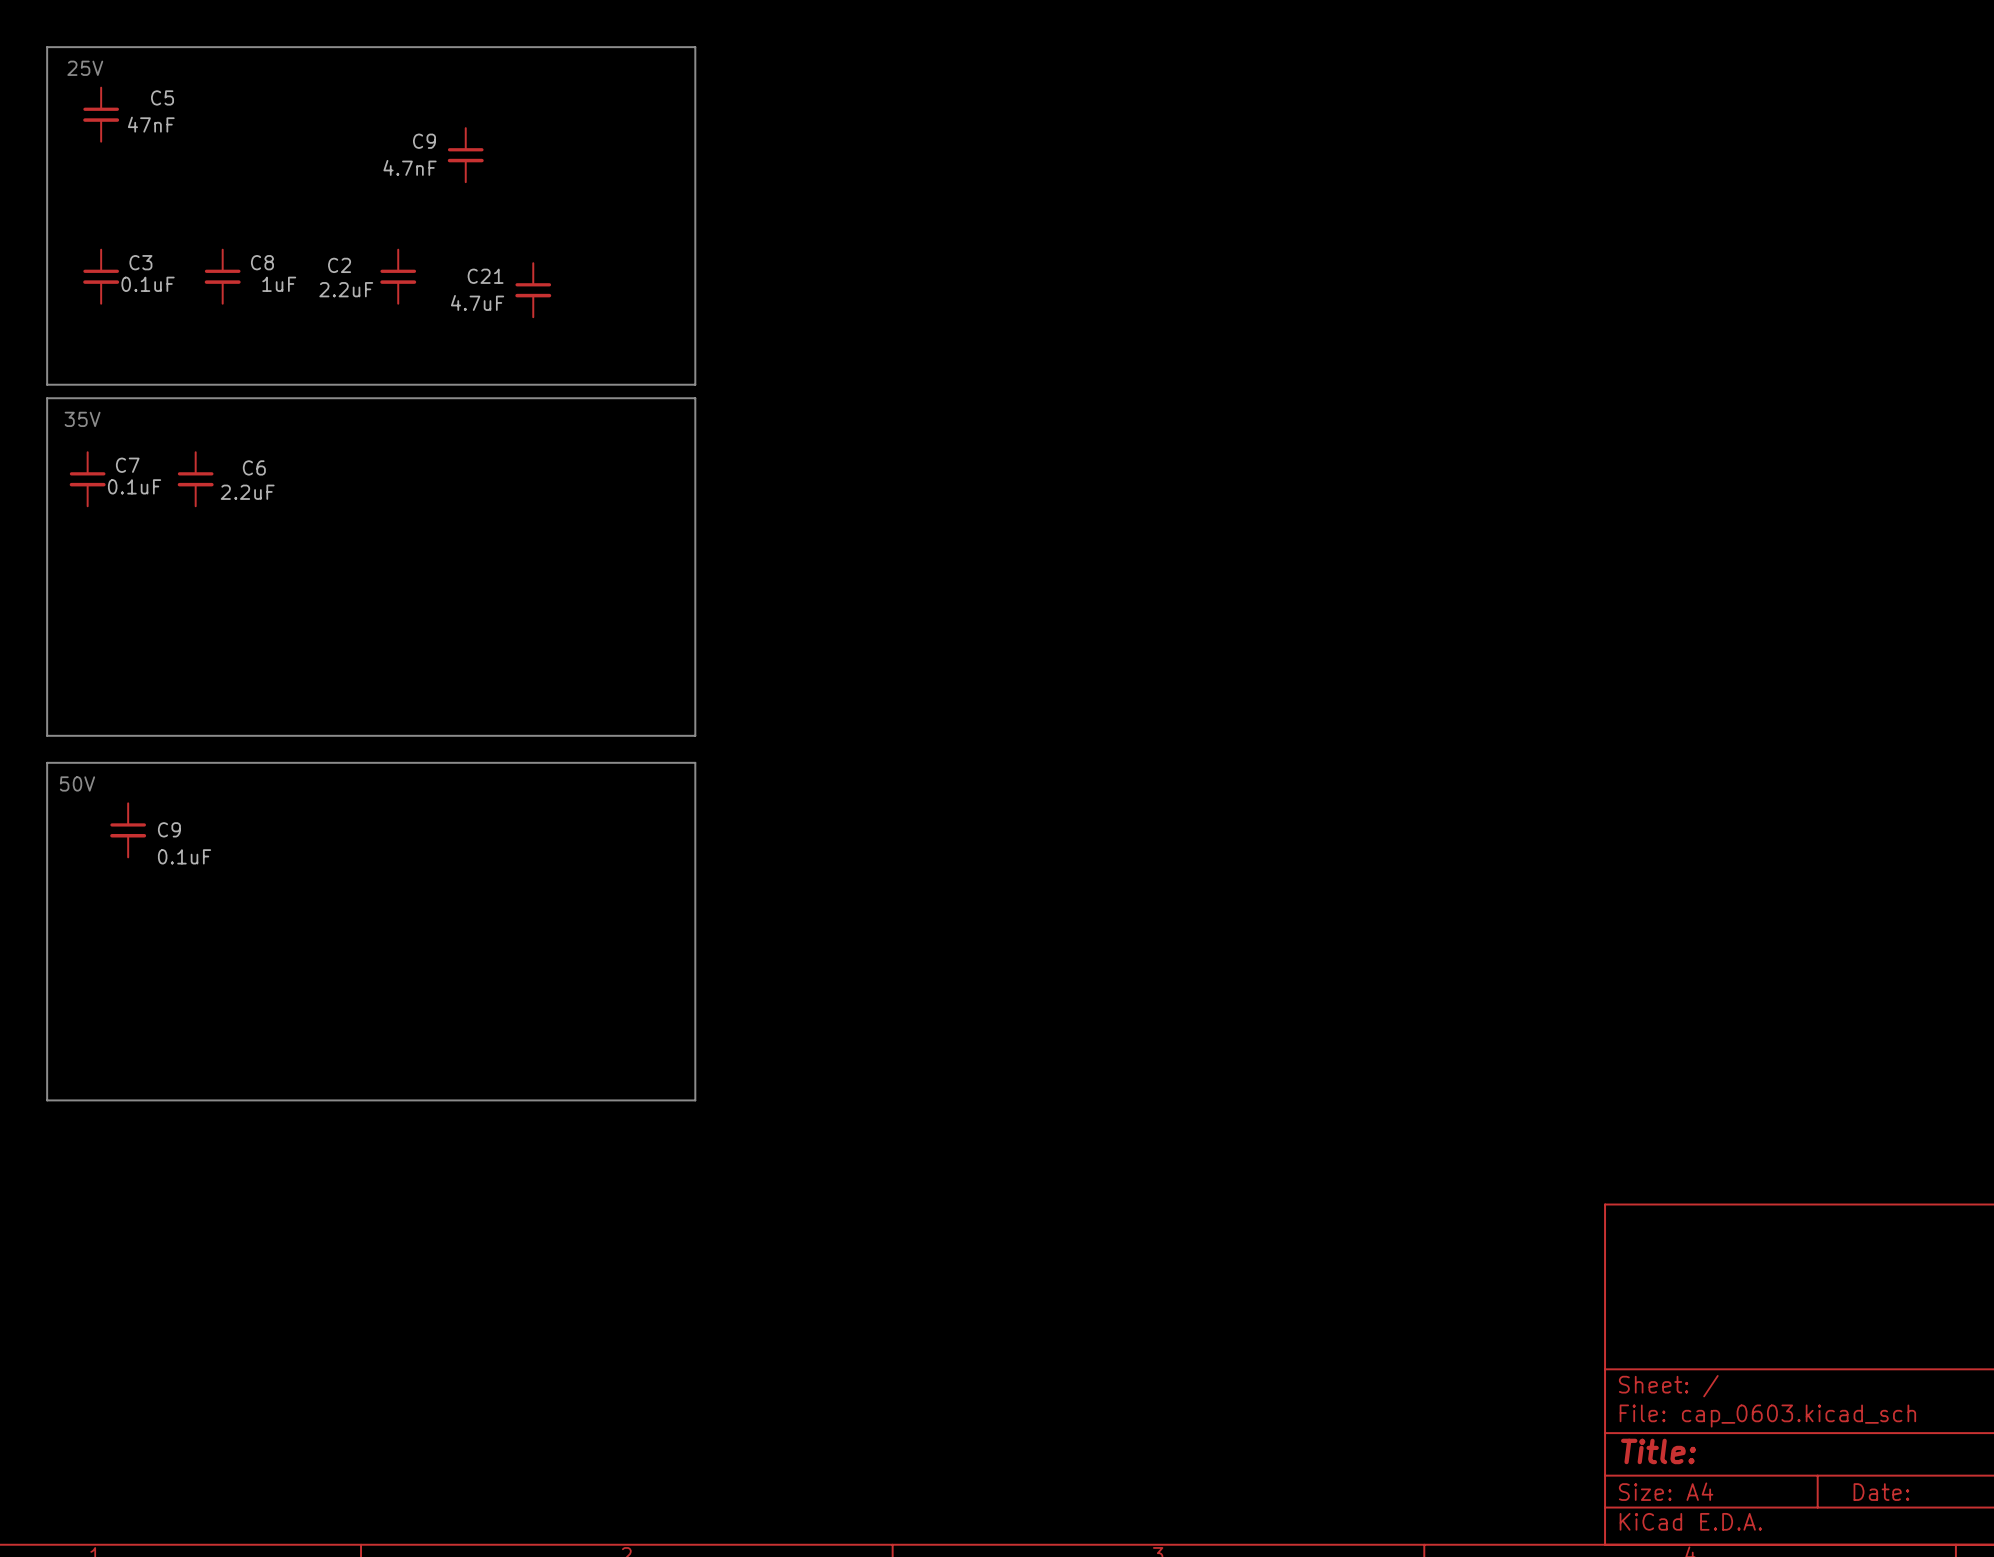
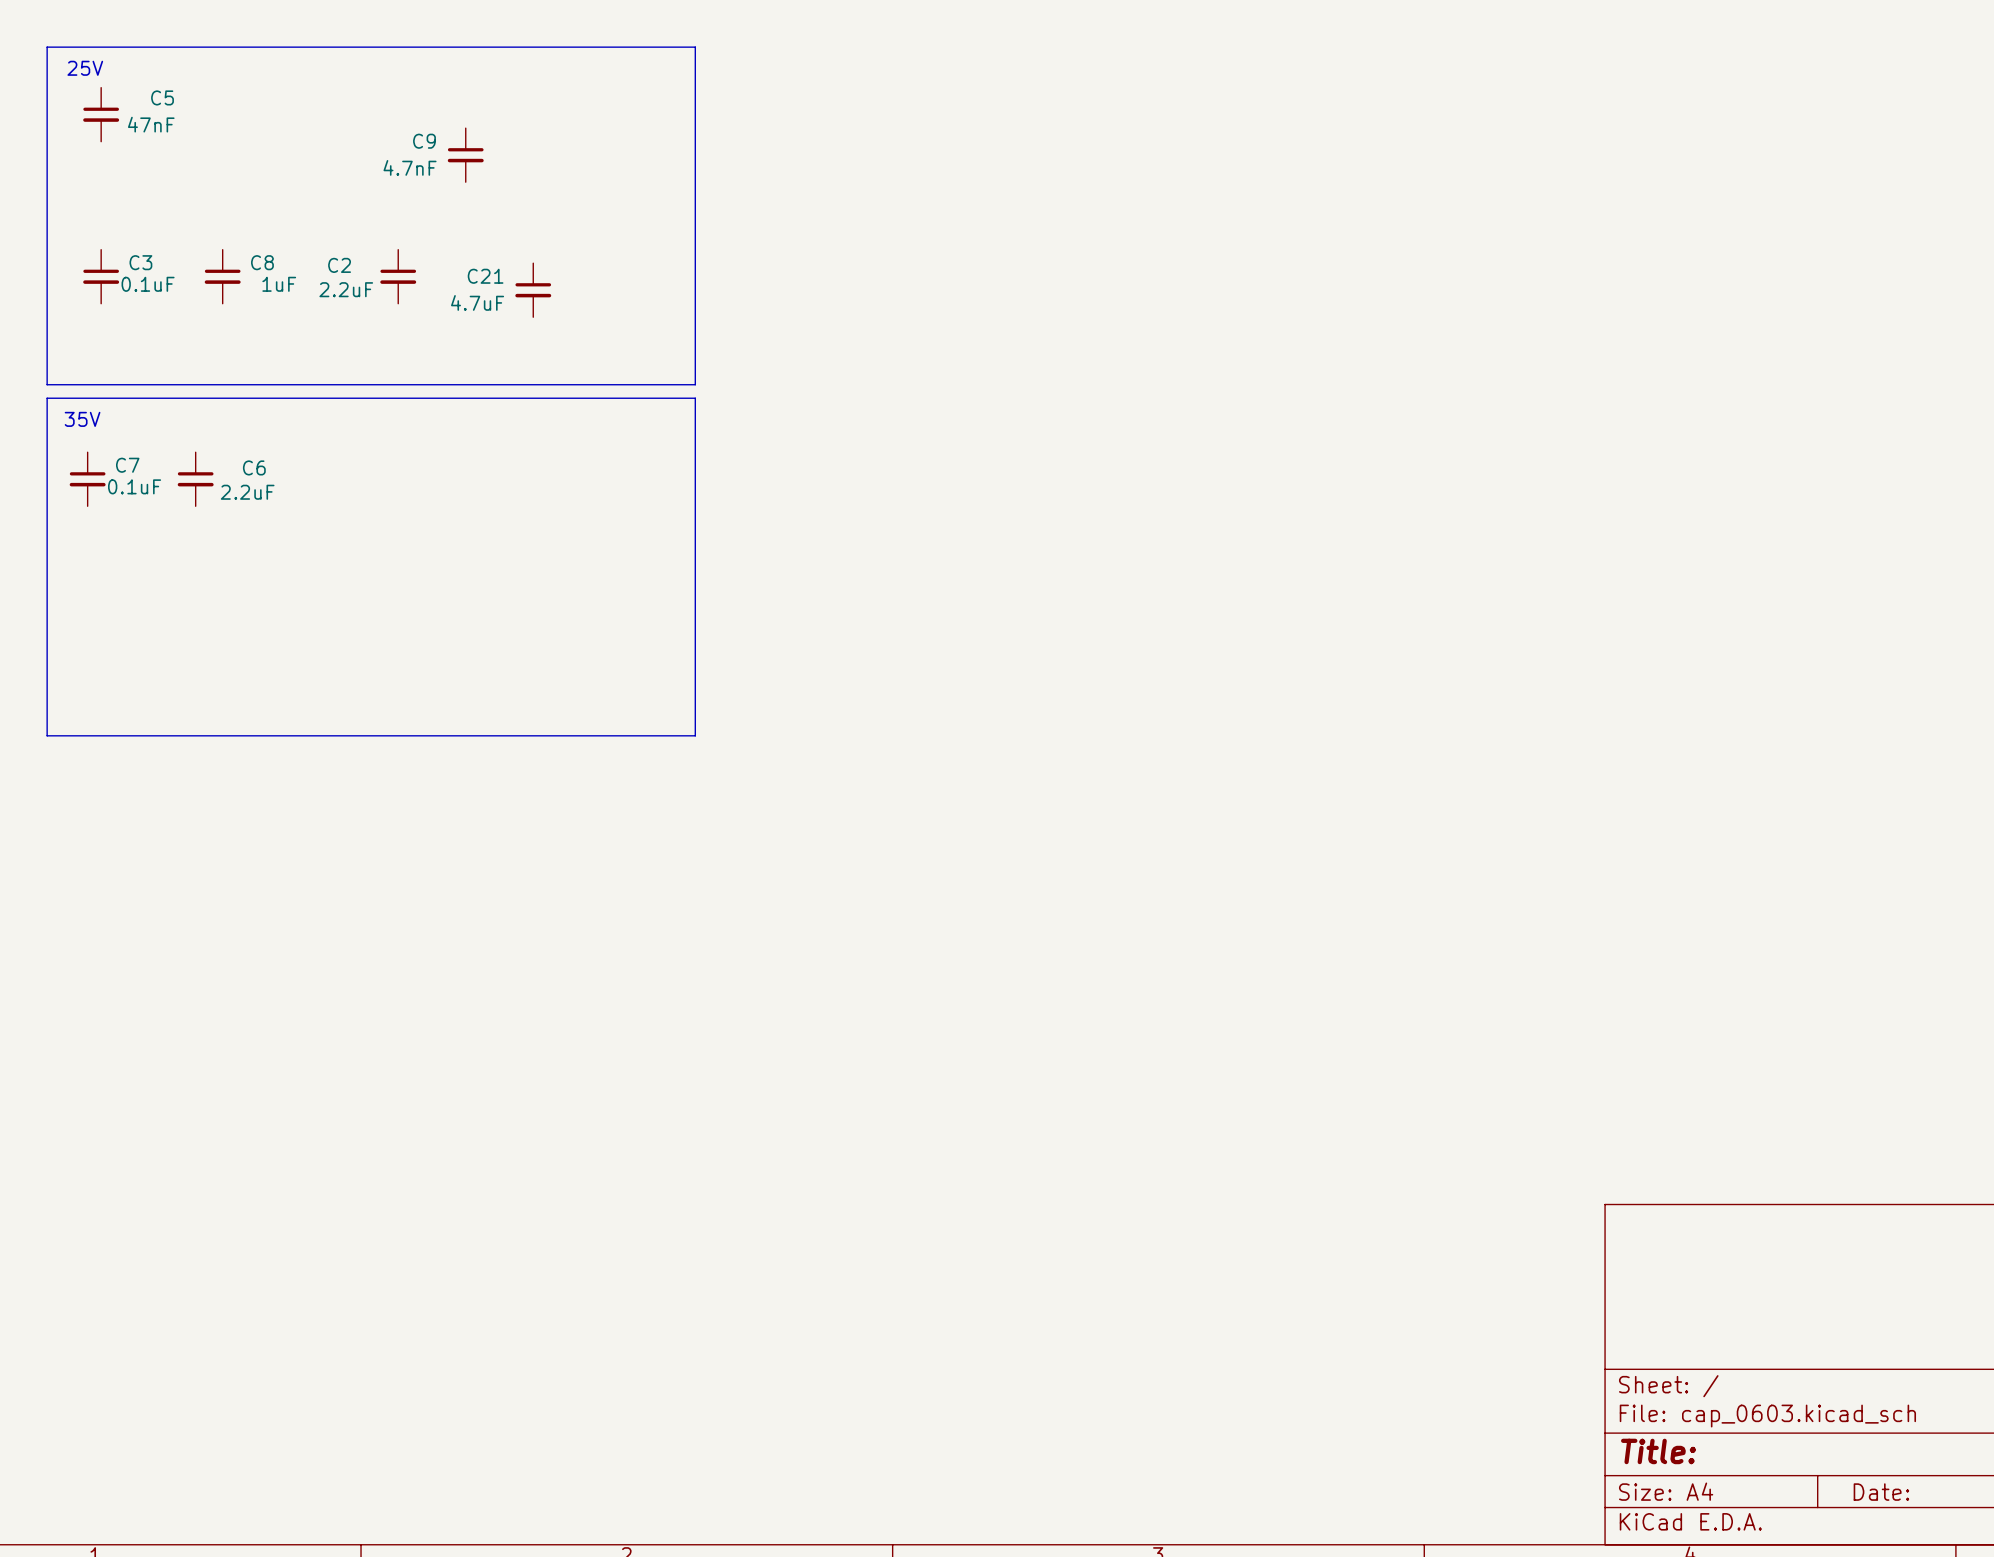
line: (47, 762) (695, 762) (695, 1100) (47, 1100) (47, 762) -> none
text: 50V (77, 783) -> none
C9: 0.1uF (128, 830) -> none

